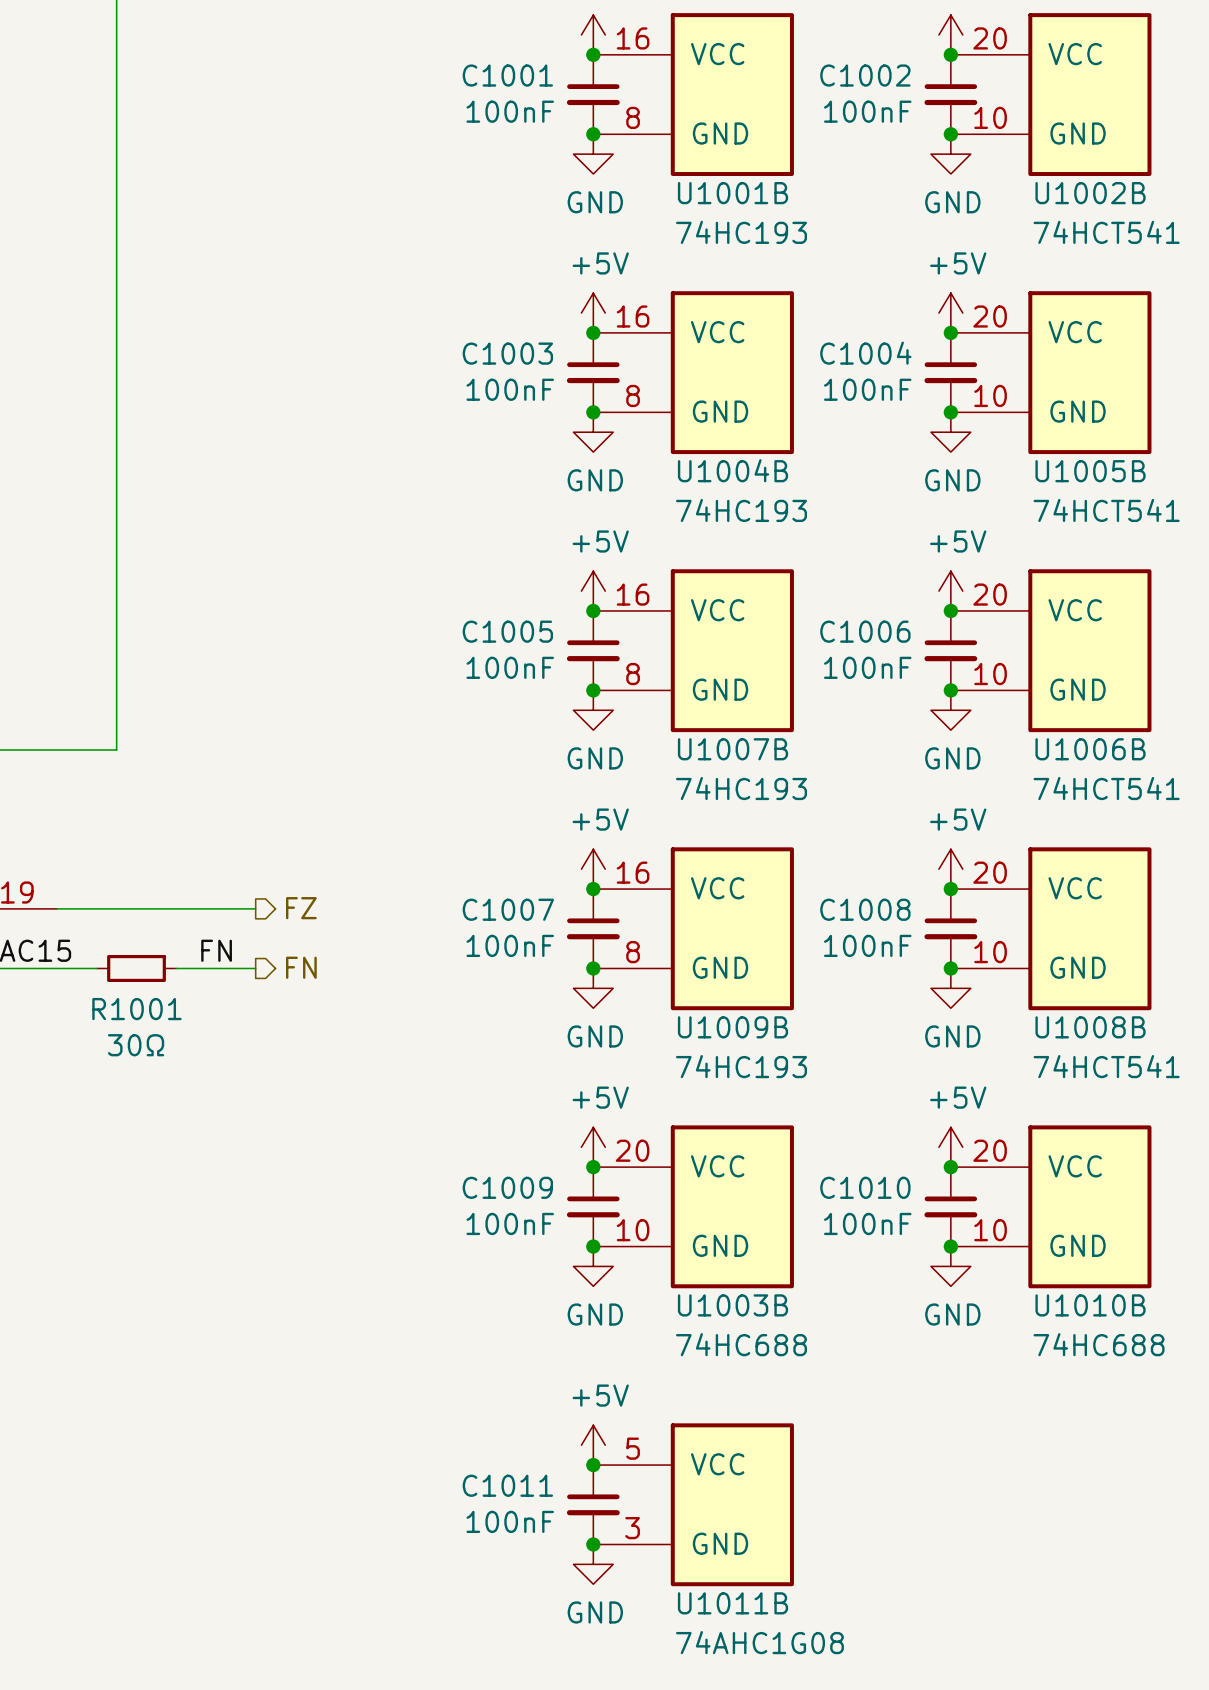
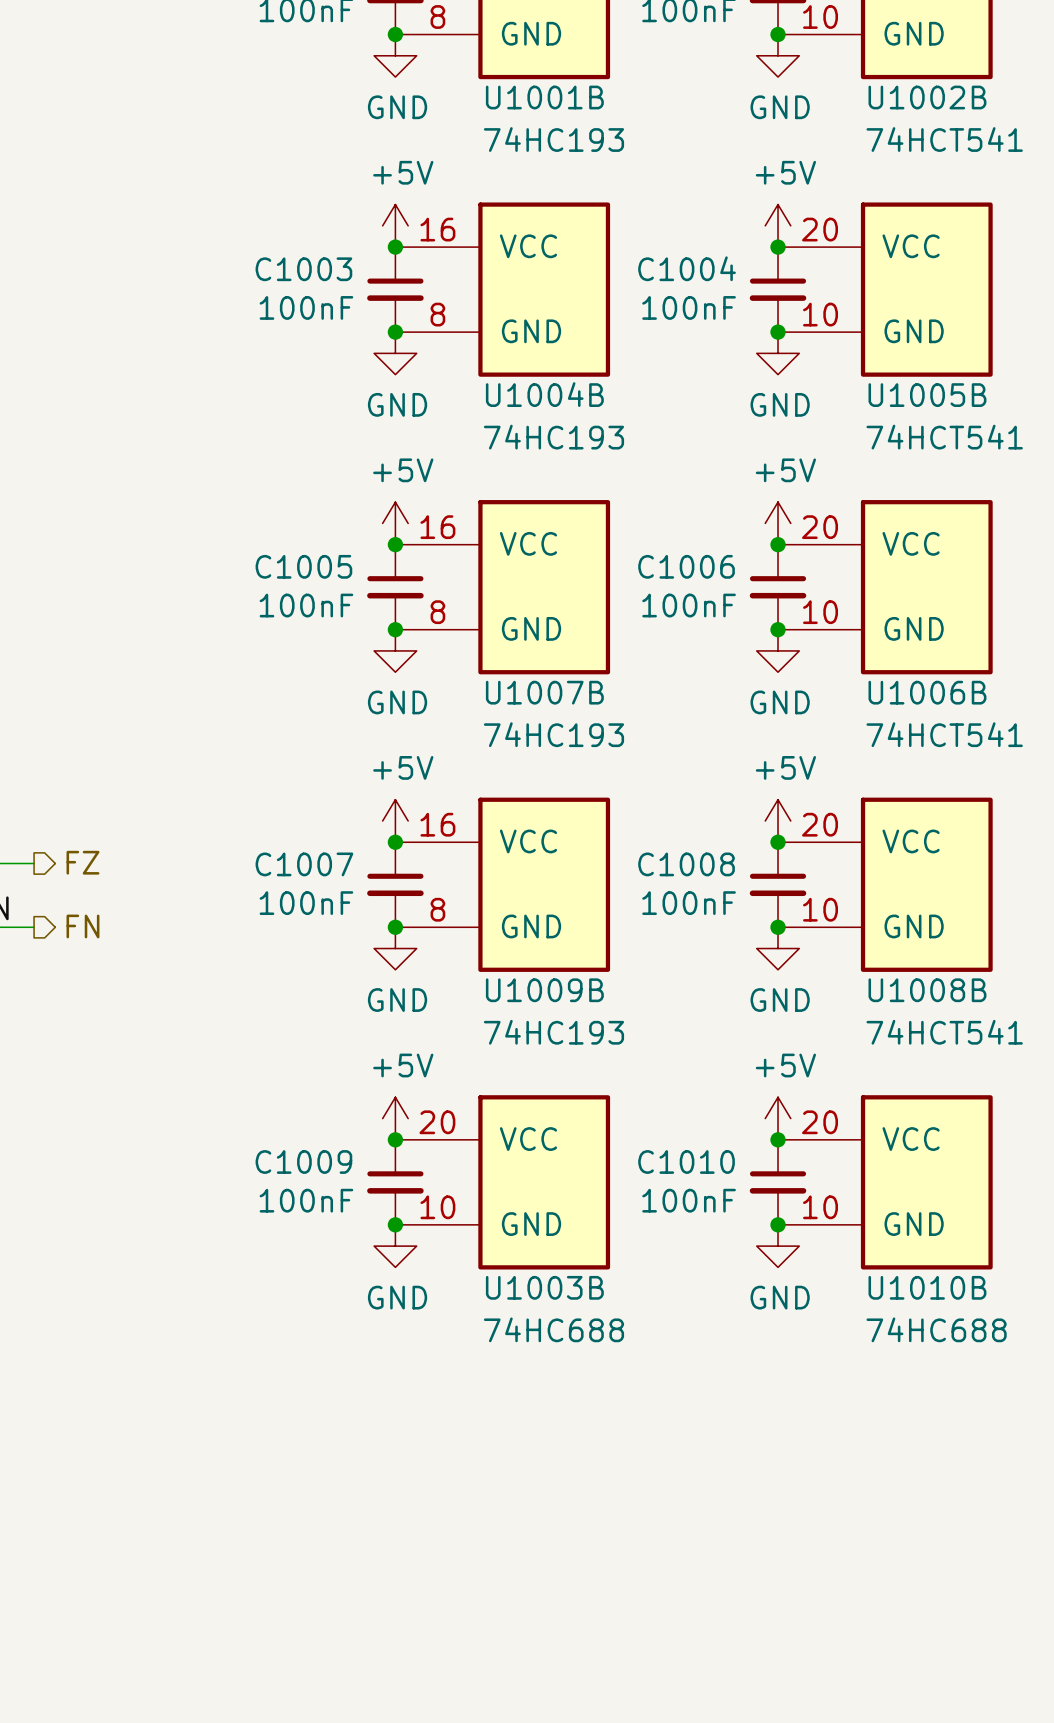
power symbol: +5V (593, 1445) -> none
junction: (593, 1465) -> none
C1011: 100nF (593, 1504) -> none
U1011B: 74AHC1G08 (693, 1504) -> none
junction: (593, 1544) -> none
power symbol: GND (593, 1564) -> none

